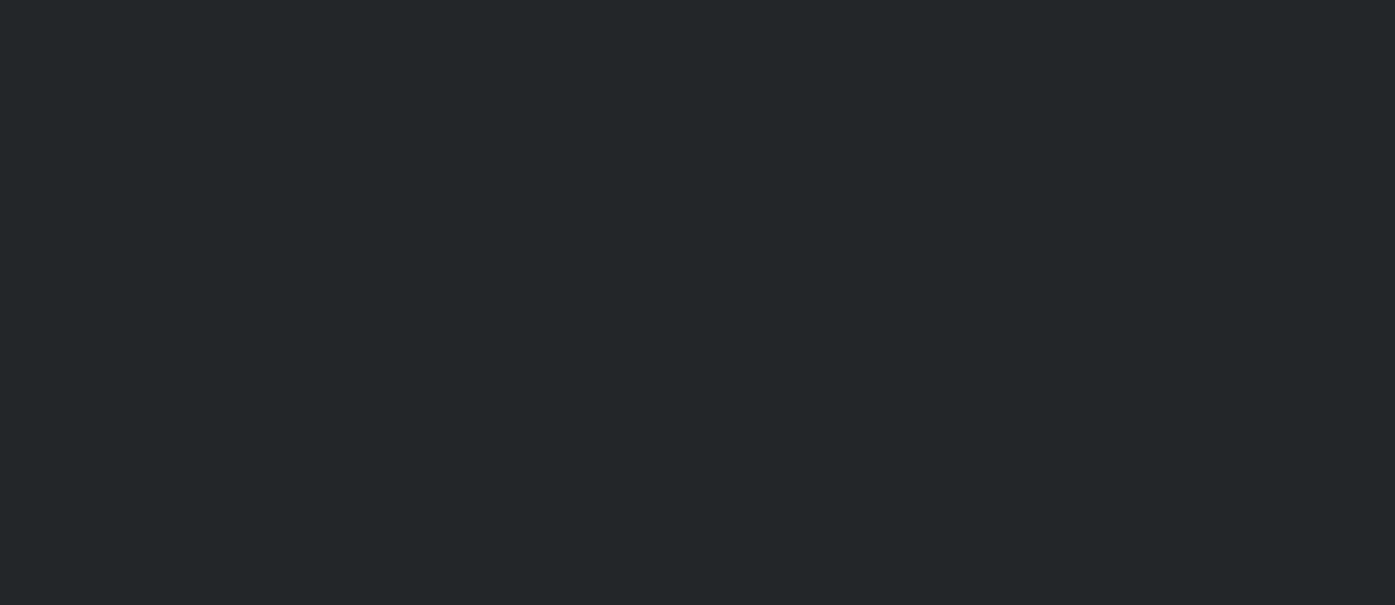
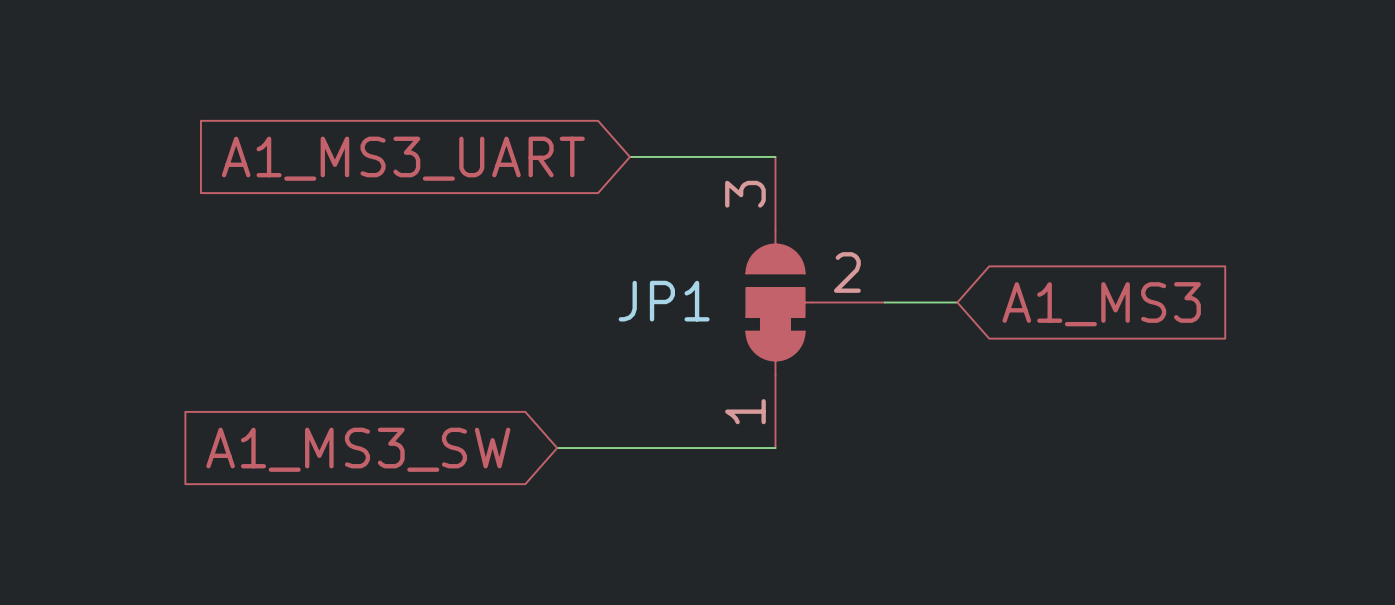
wire: none -> (629, 156) (775, 156)
global label: none -> A1_MS3_UART (403, 158)
JP1: none -> (815, 302)
wire: none -> (884, 302) (957, 302)
global label: none -> A1_MS3 (1101, 304)
wire: none -> (557, 448) (775, 448)
global label: none -> A1_MS3_SW (358, 449)

